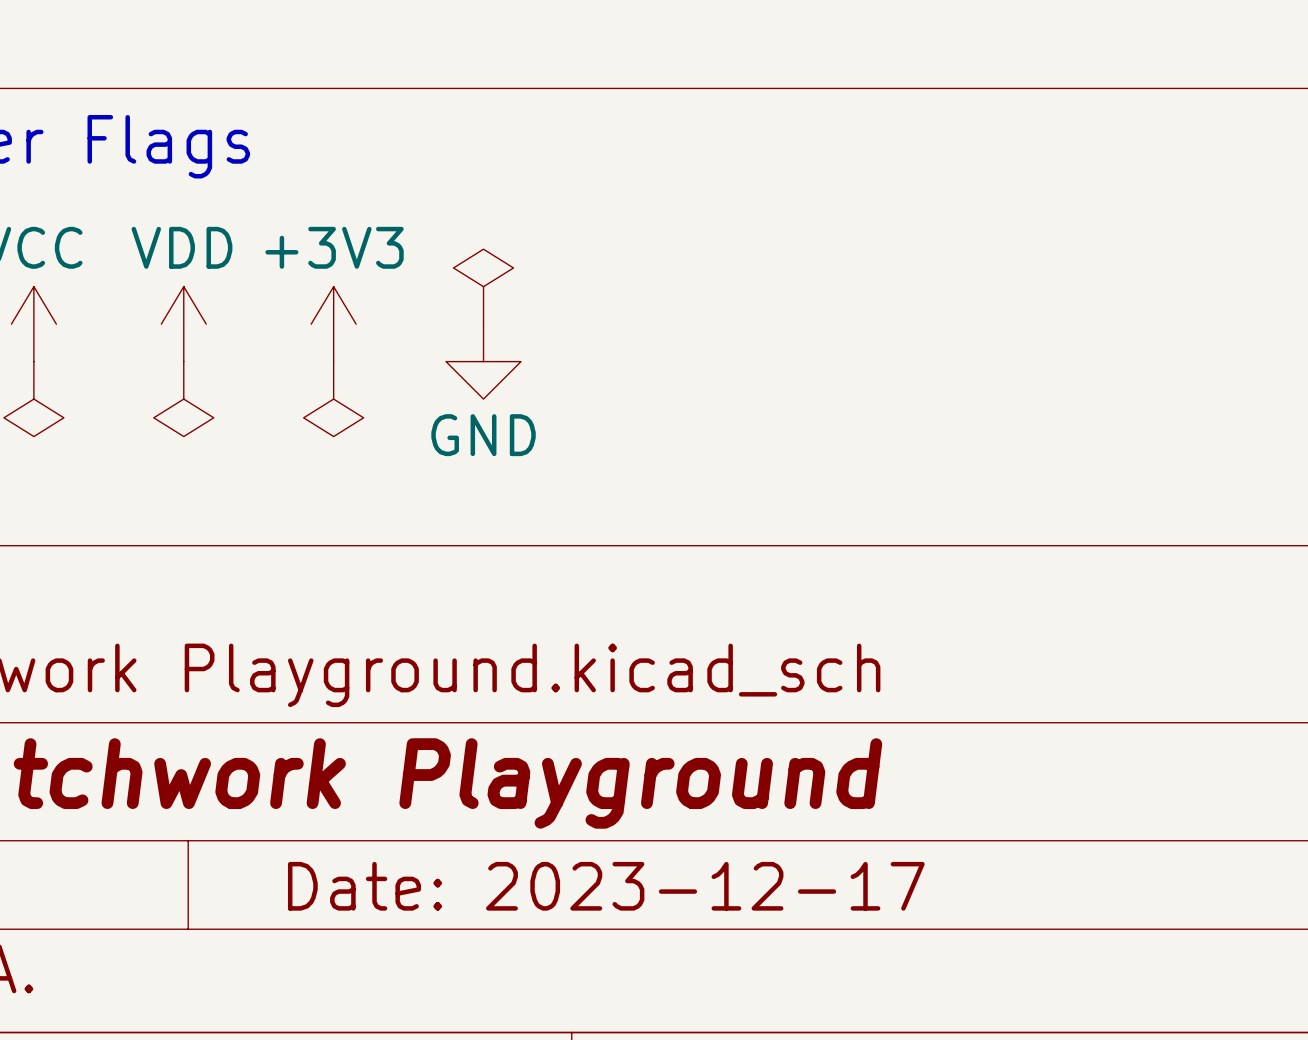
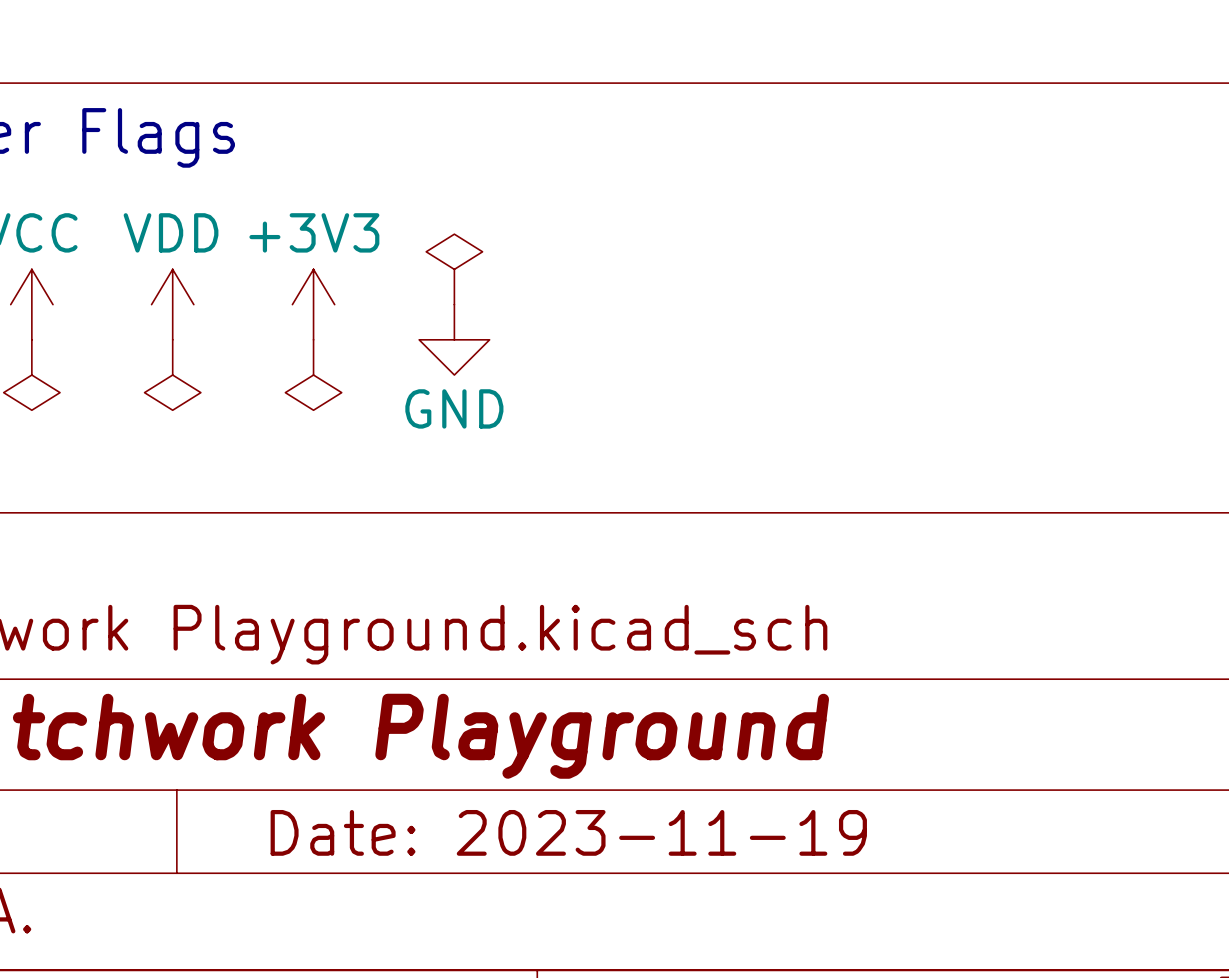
title block: Date: 2023-12-17 (606, 886) -> Date: 2023-11-19 (568, 832)

